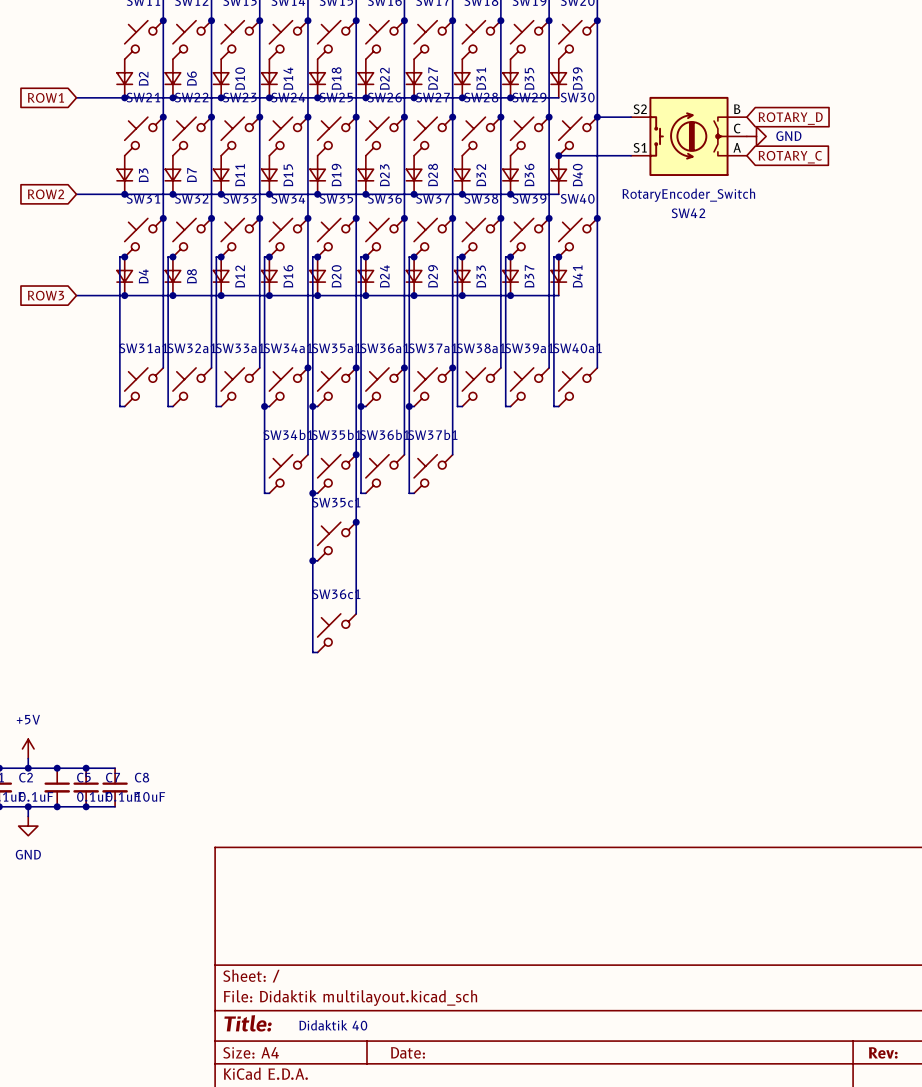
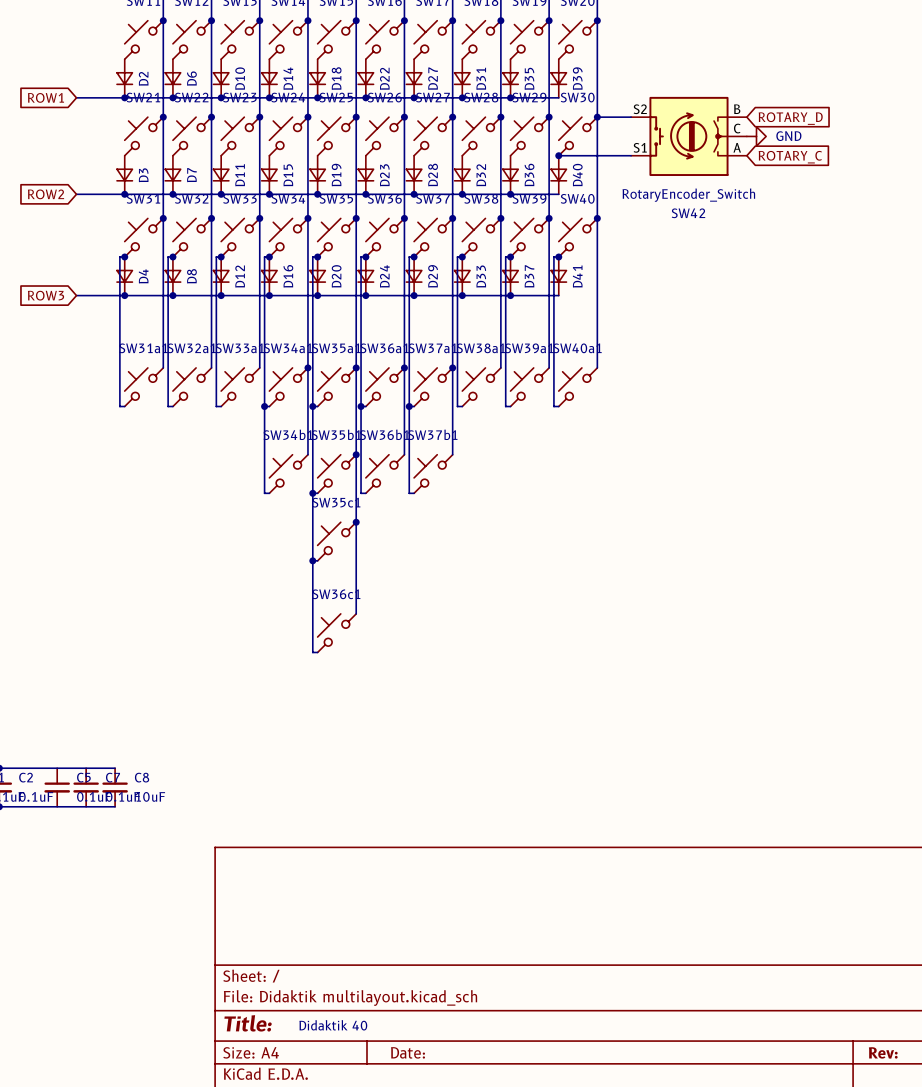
power symbol: +5V (28, 748) -> none
wire: (28, 758) (28, 768) -> none
junction: (28, 768) -> none
junction: (57, 768) -> none
junction: (86, 768) -> none
wire: (28, 806) (28, 816) -> none
junction: (28, 806) -> none
junction: (57, 806) -> none
junction: (86, 806) -> none
power symbol: GND (28, 826) -> none

